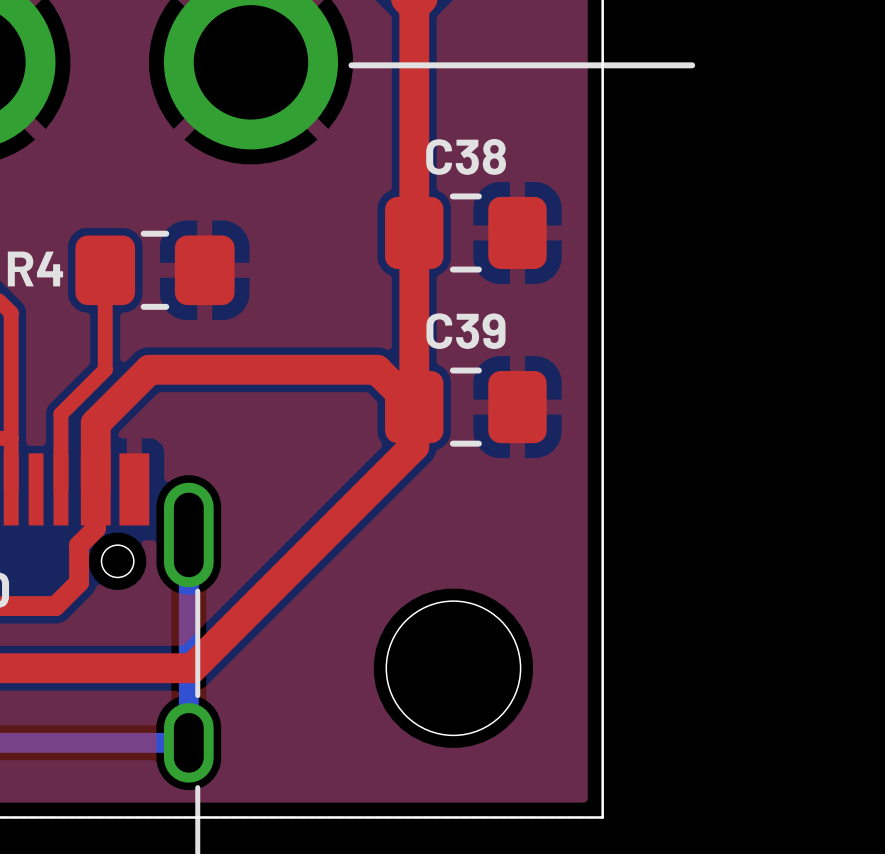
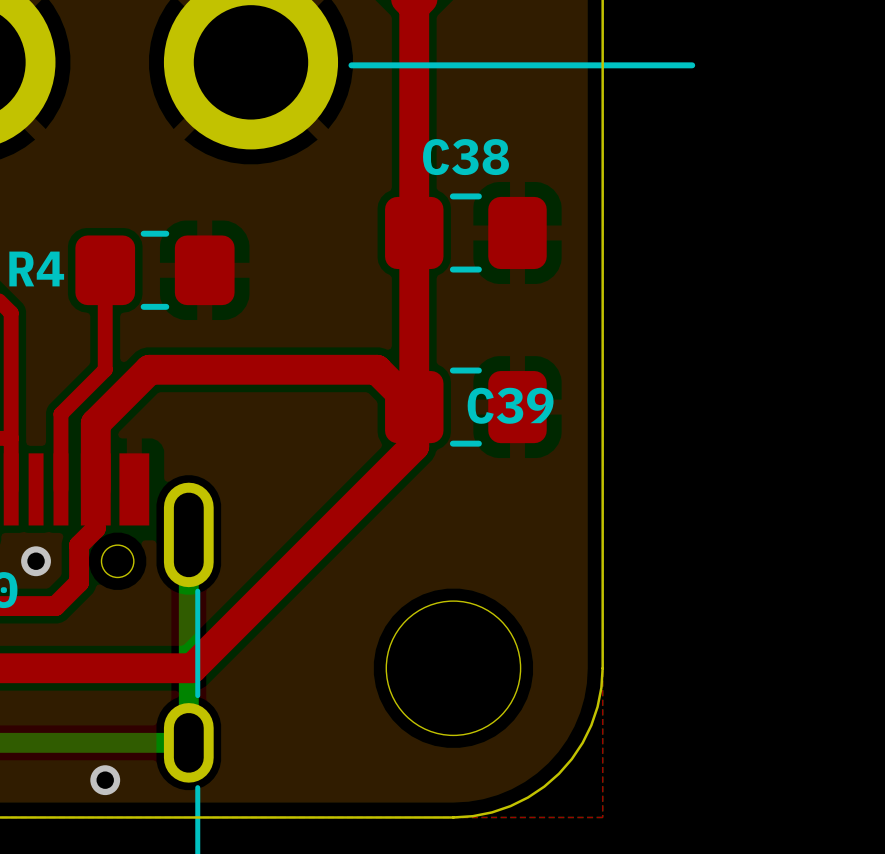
C39 name position: C39 (465, 331) -> C39 (510, 405)
via: none -> (36, 561)
board edge: (602, 668) (602, 817) (453, 817) -> (602, 668) (601, 687) (591, 725) (571, 759) (558, 773) (544, 786) (510, 806) (492, 812) (453, 817)
via: none -> (105, 780)

